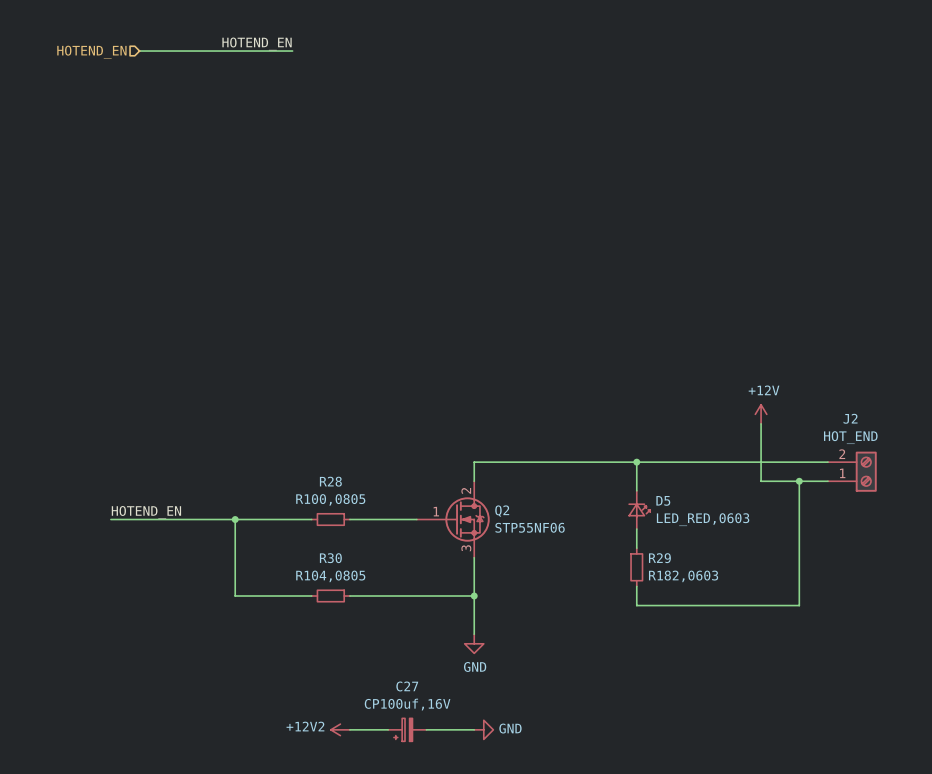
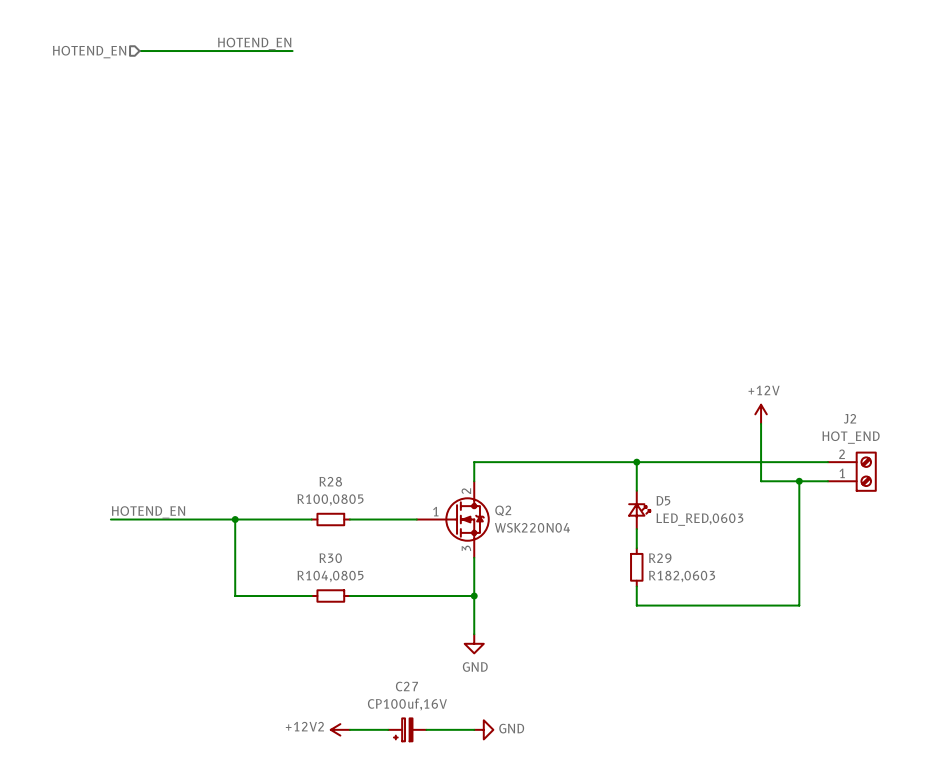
Q2 value: STP55NF06 (530, 527) -> WSK220N04 (532, 527)

